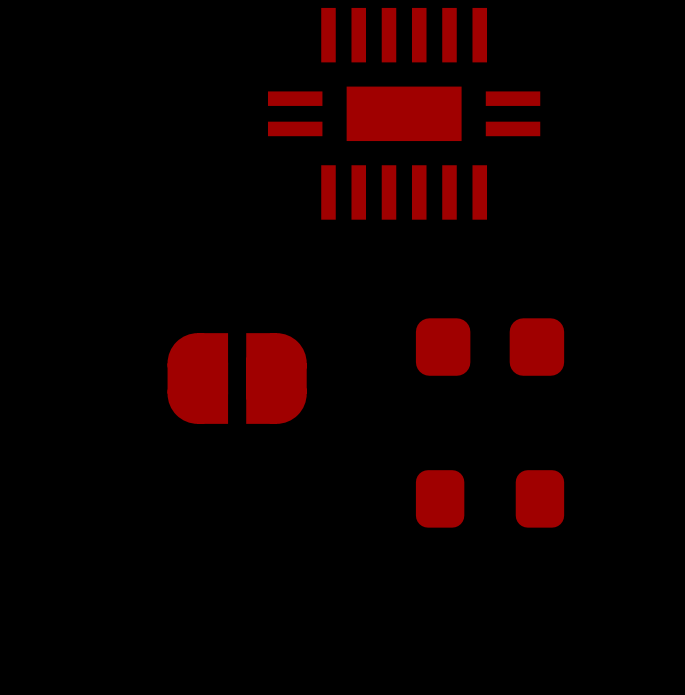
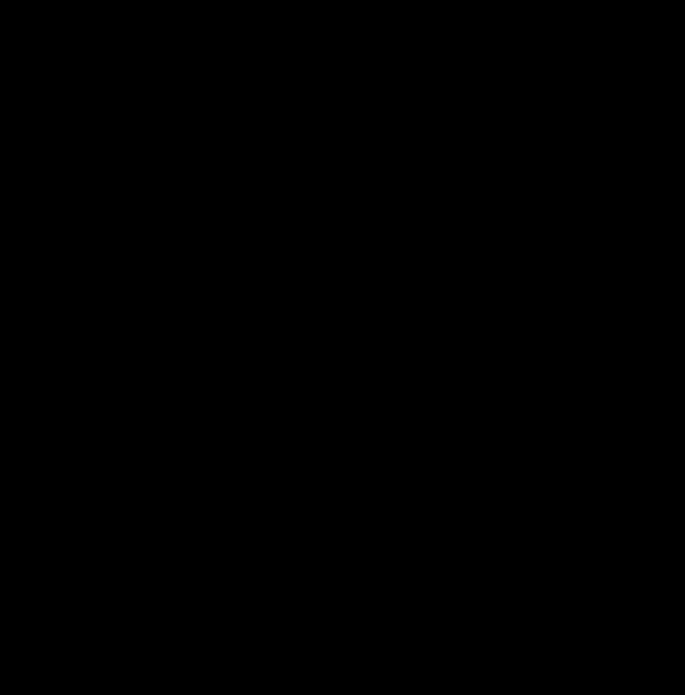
part: (404, 113) -> none
part: (490, 347) -> none
part: (237, 378) -> none
part: (490, 498) -> none

